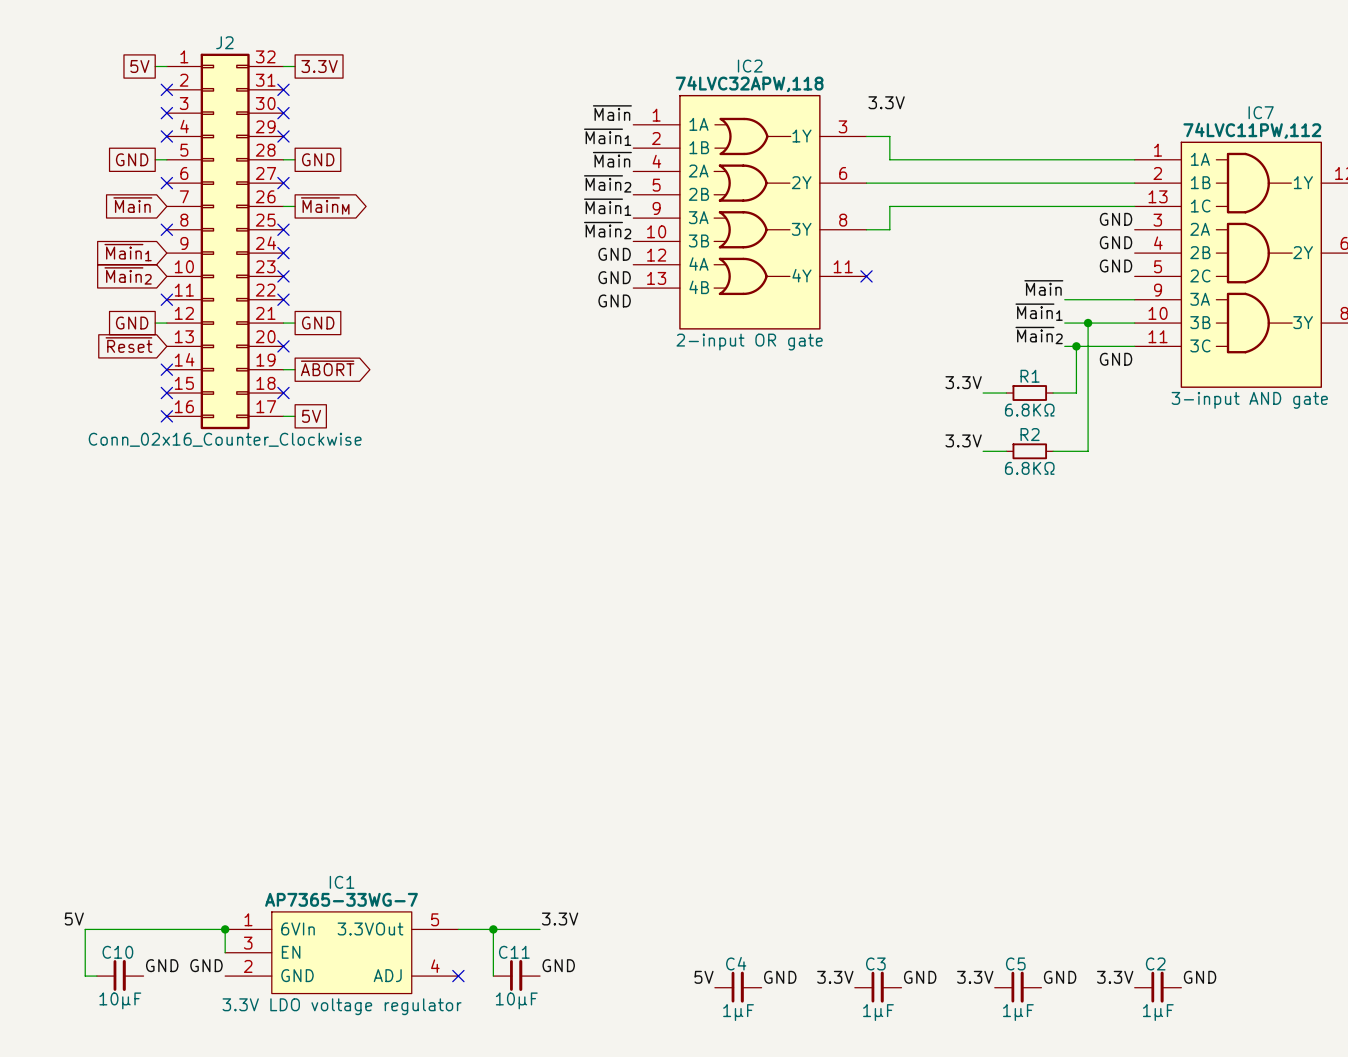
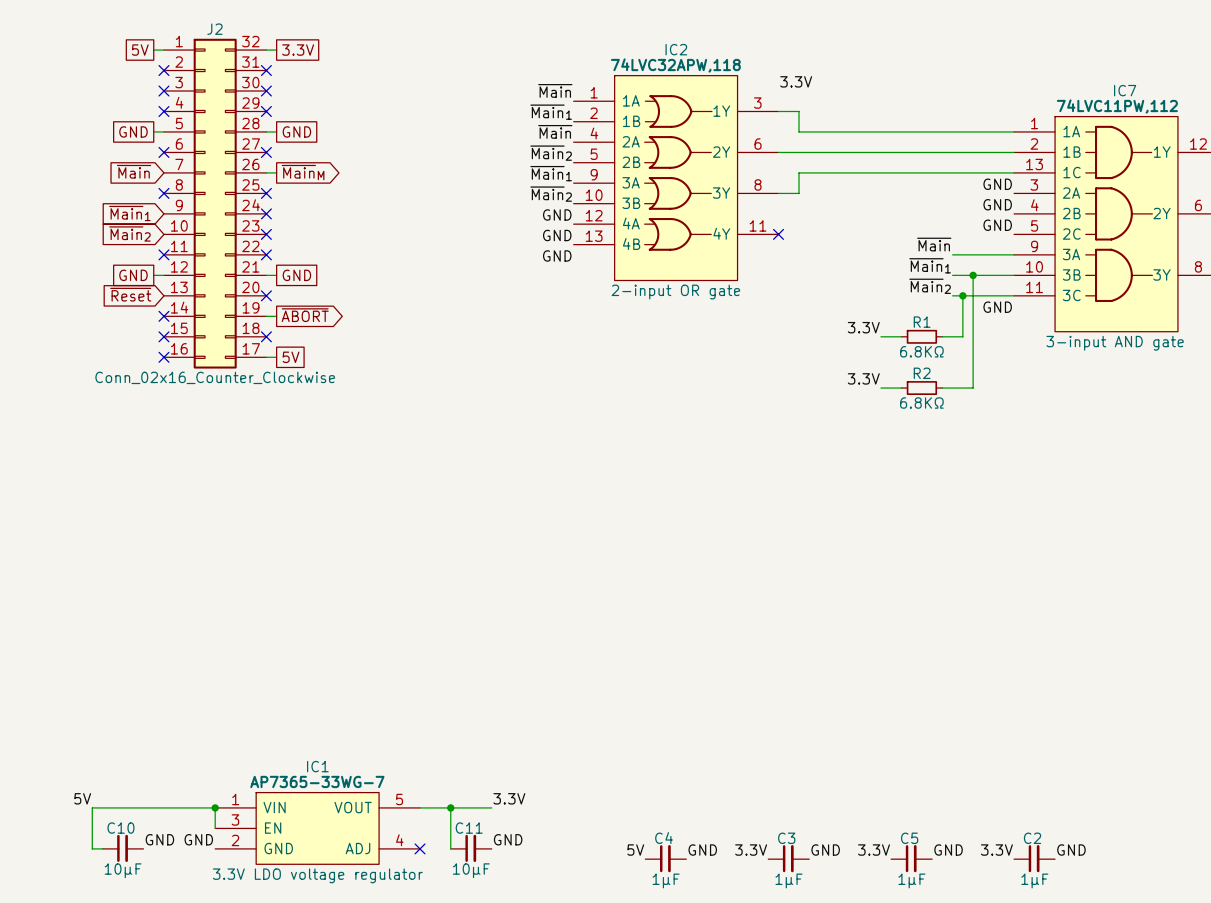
IC1 pin name: 6VIn (298, 928) -> VIN (274, 807)
IC1 pin name: 3.3VOut (370, 928) -> VOUT (353, 807)

